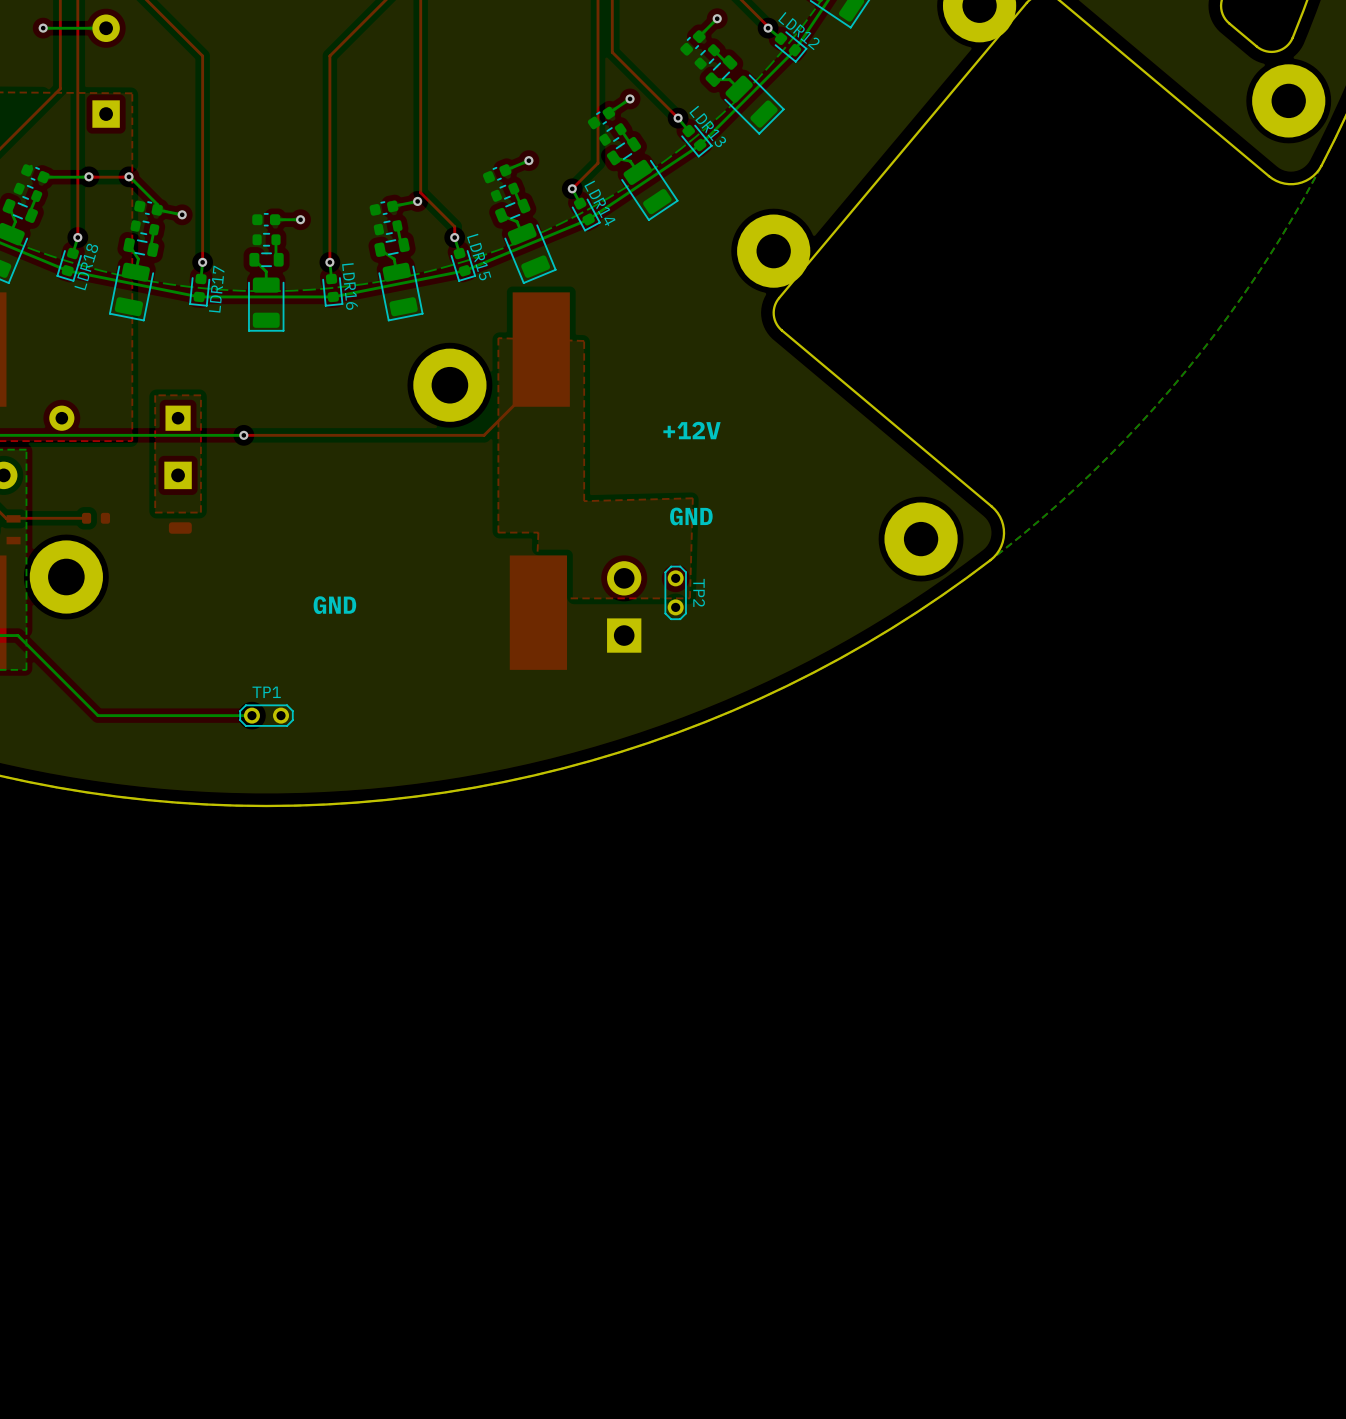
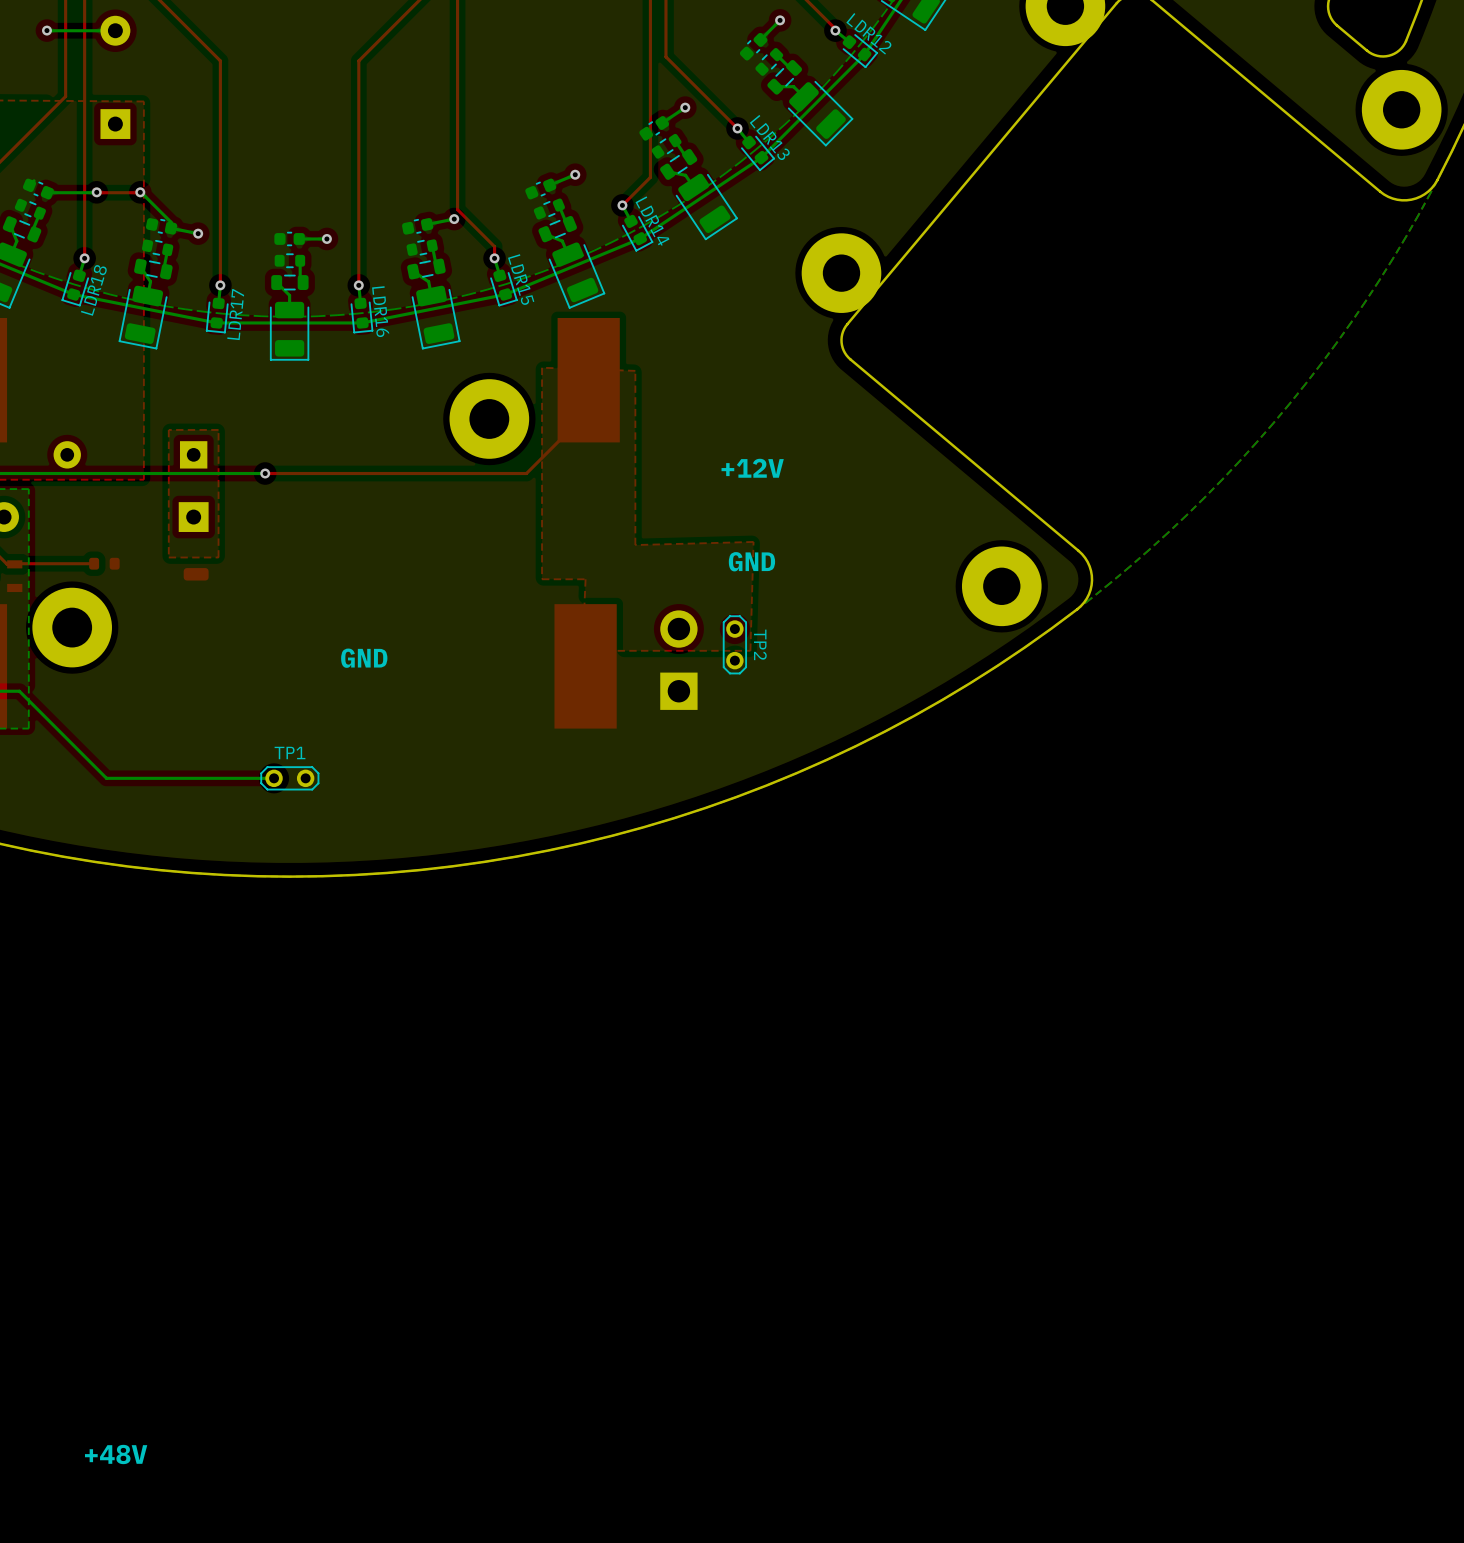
text: none -> +48V (116, 1454)

